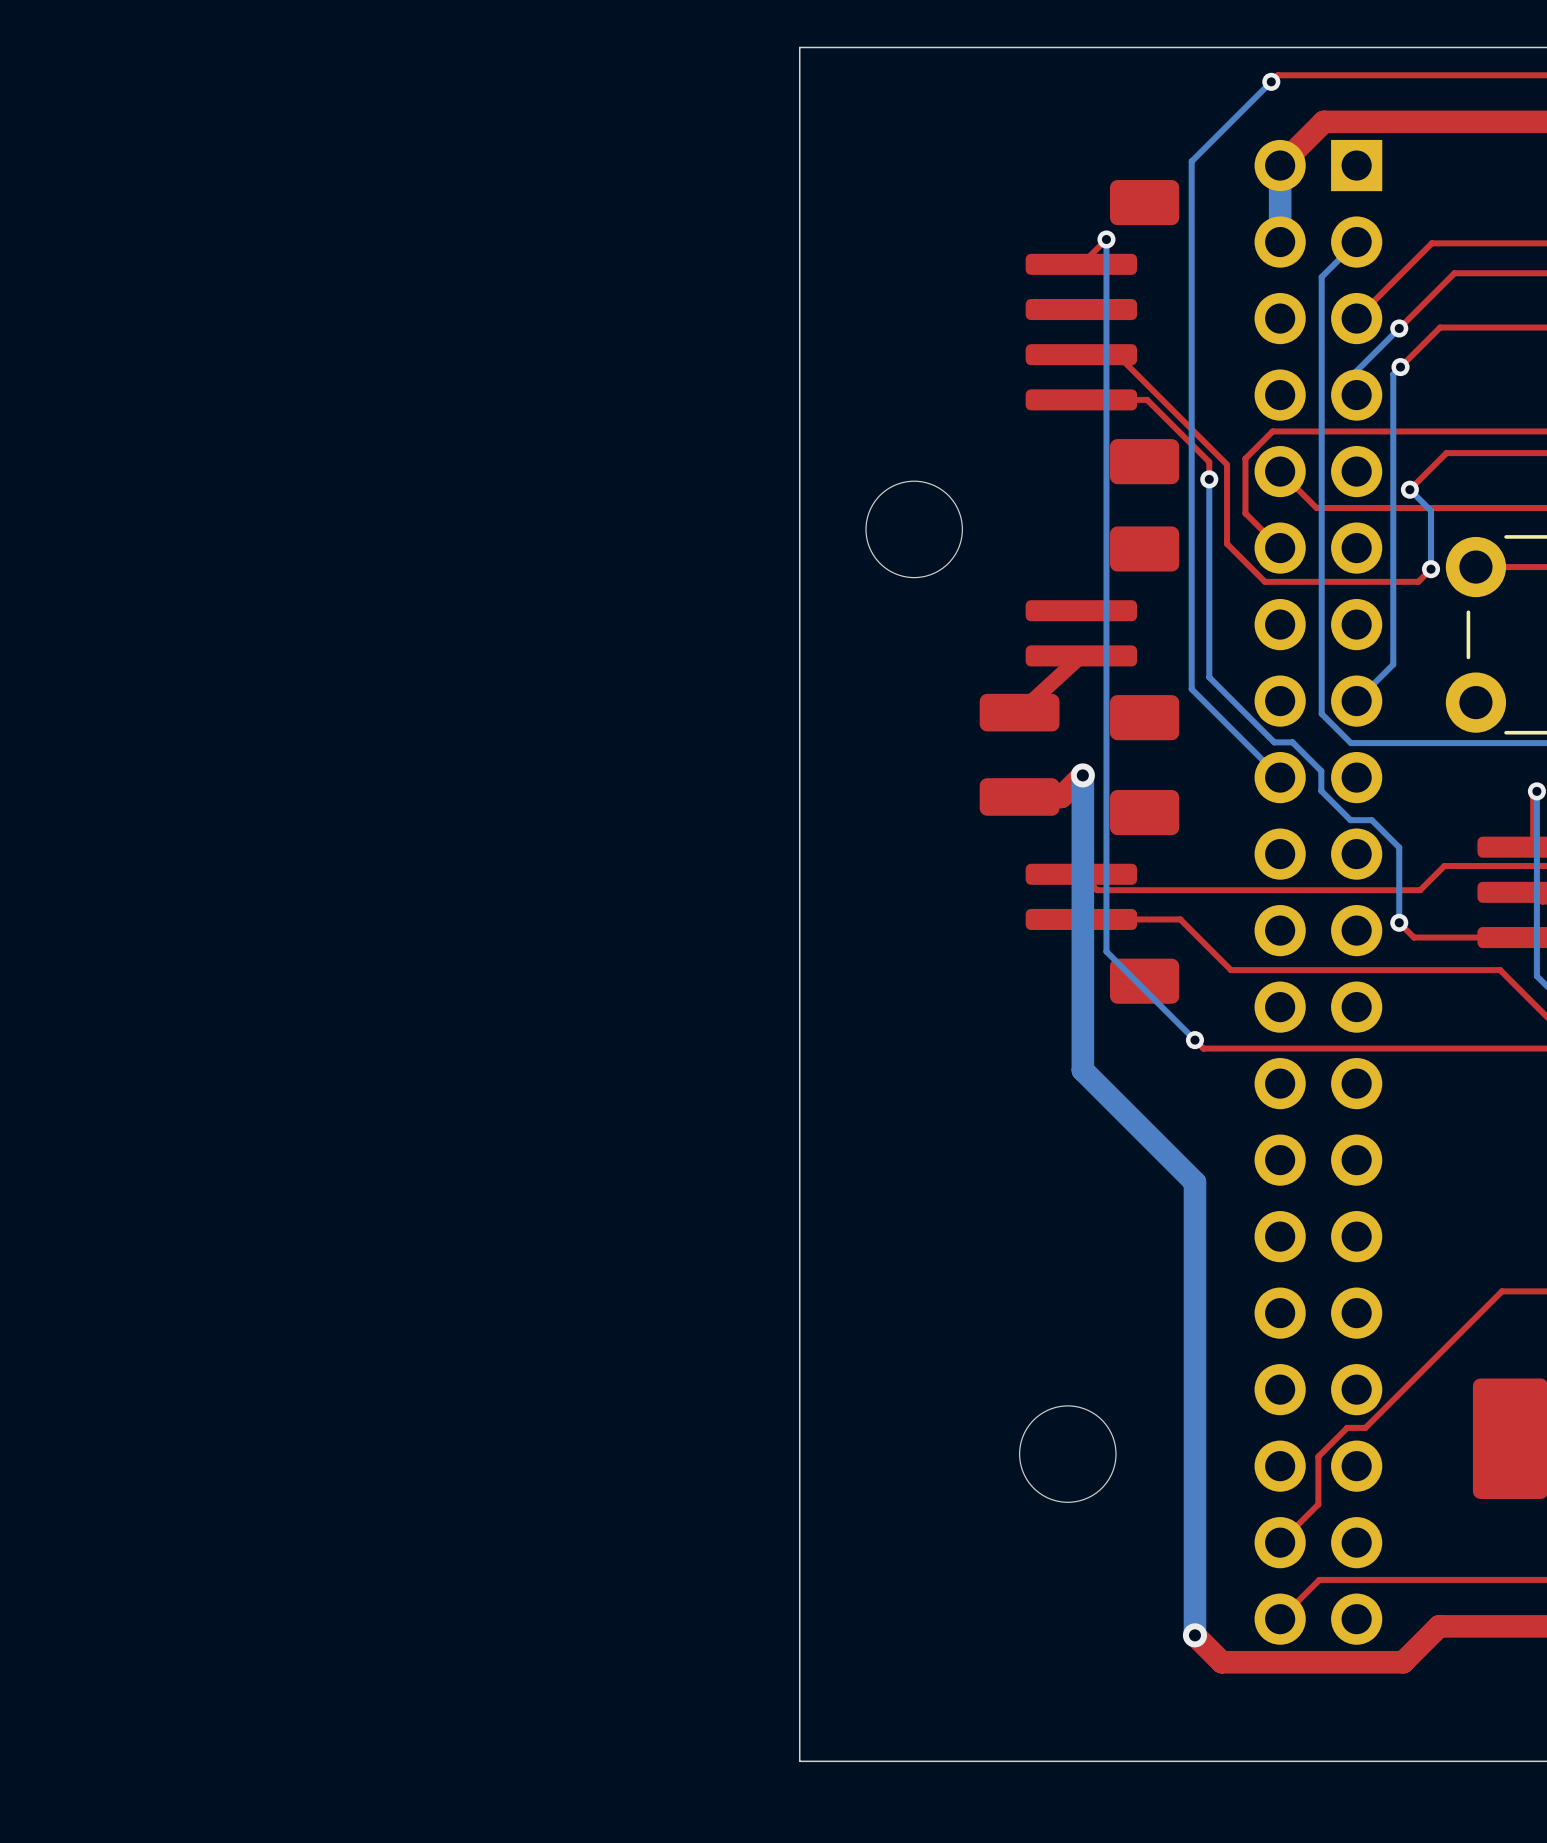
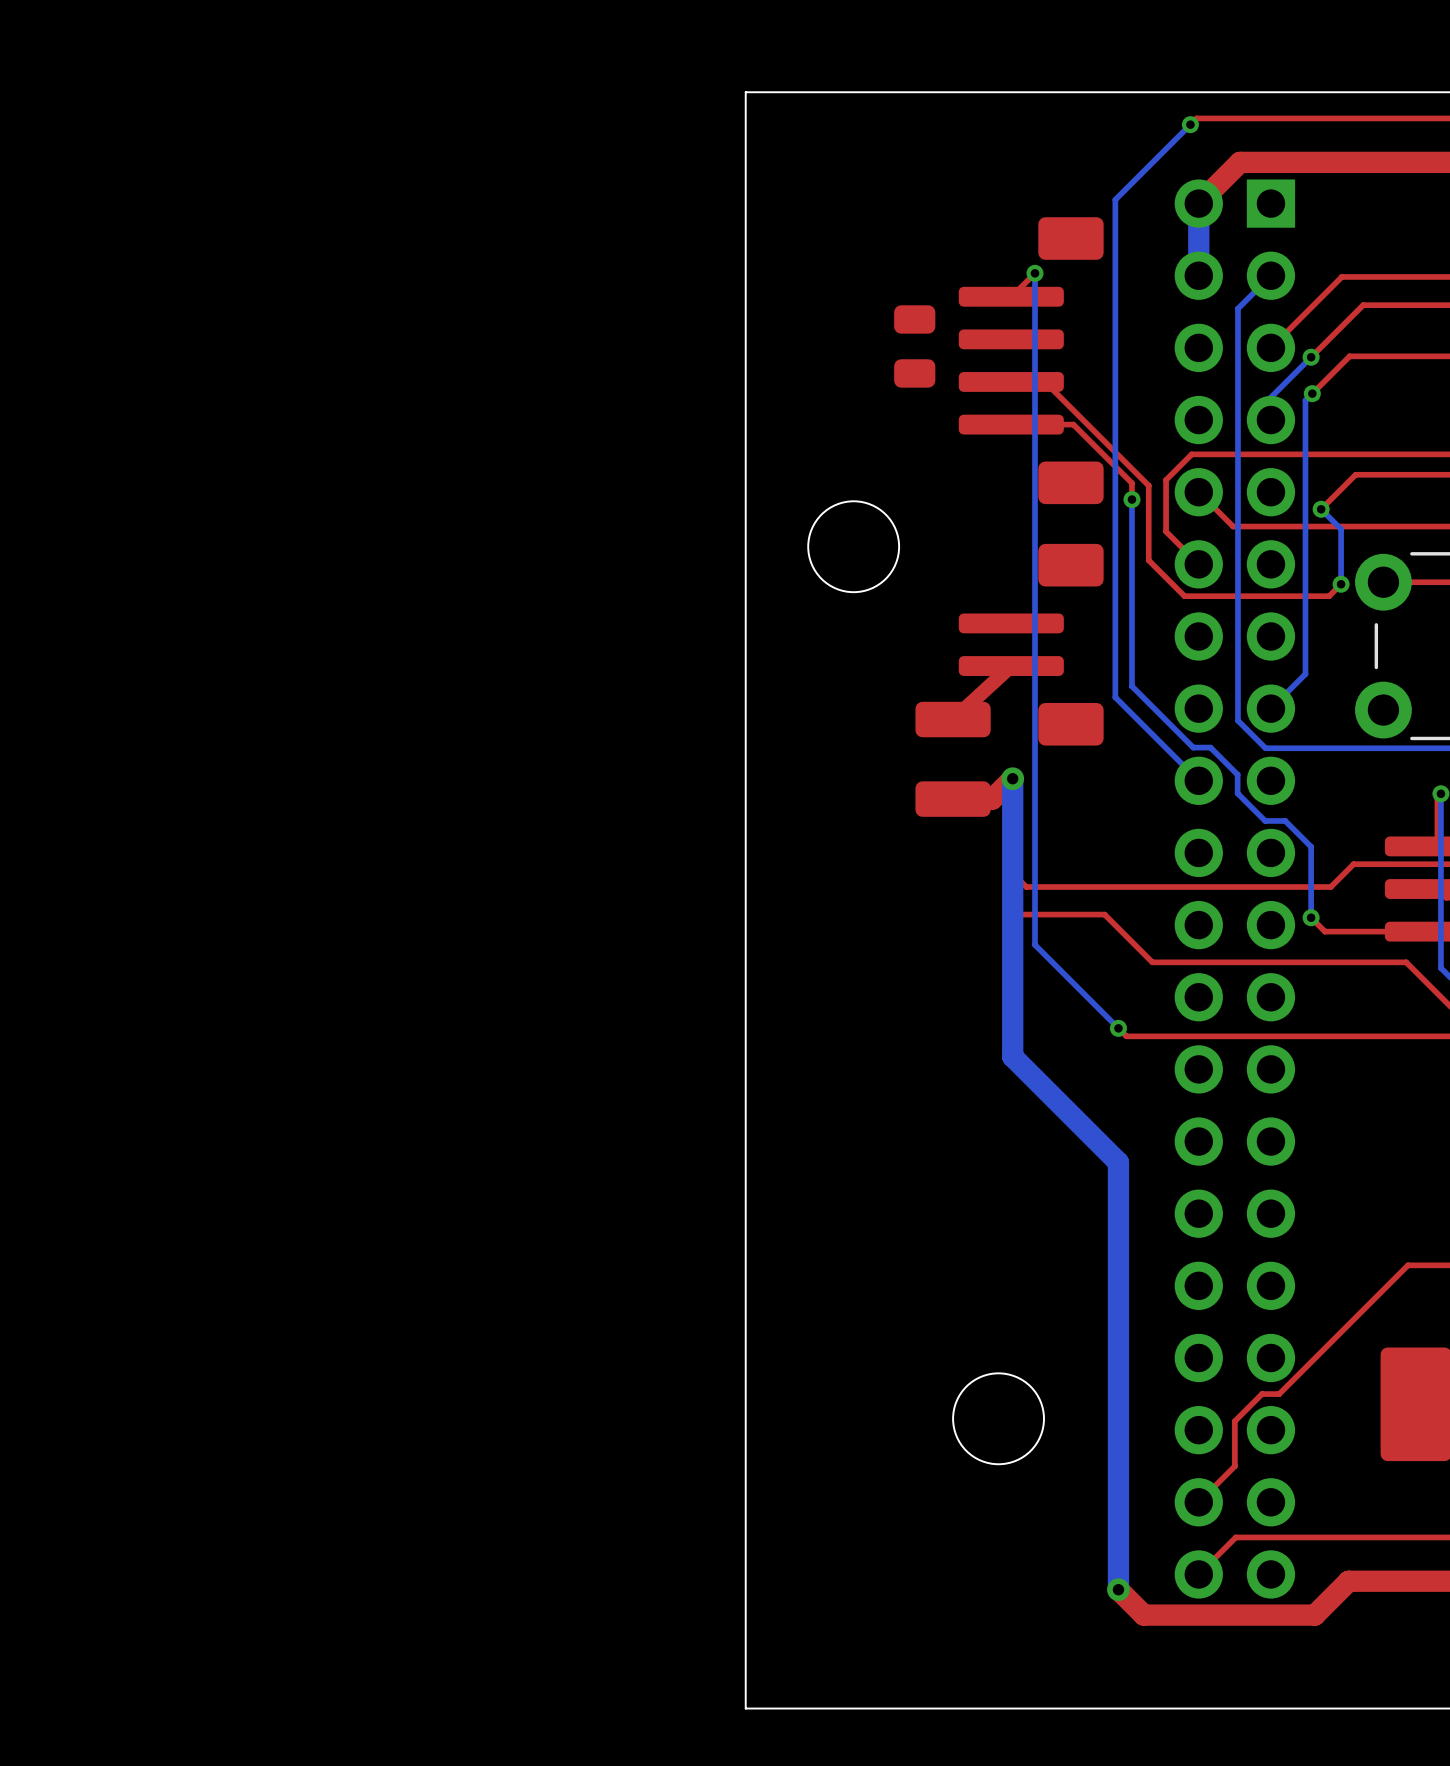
part: none -> (914, 346)
part: (1102, 896) -> none

